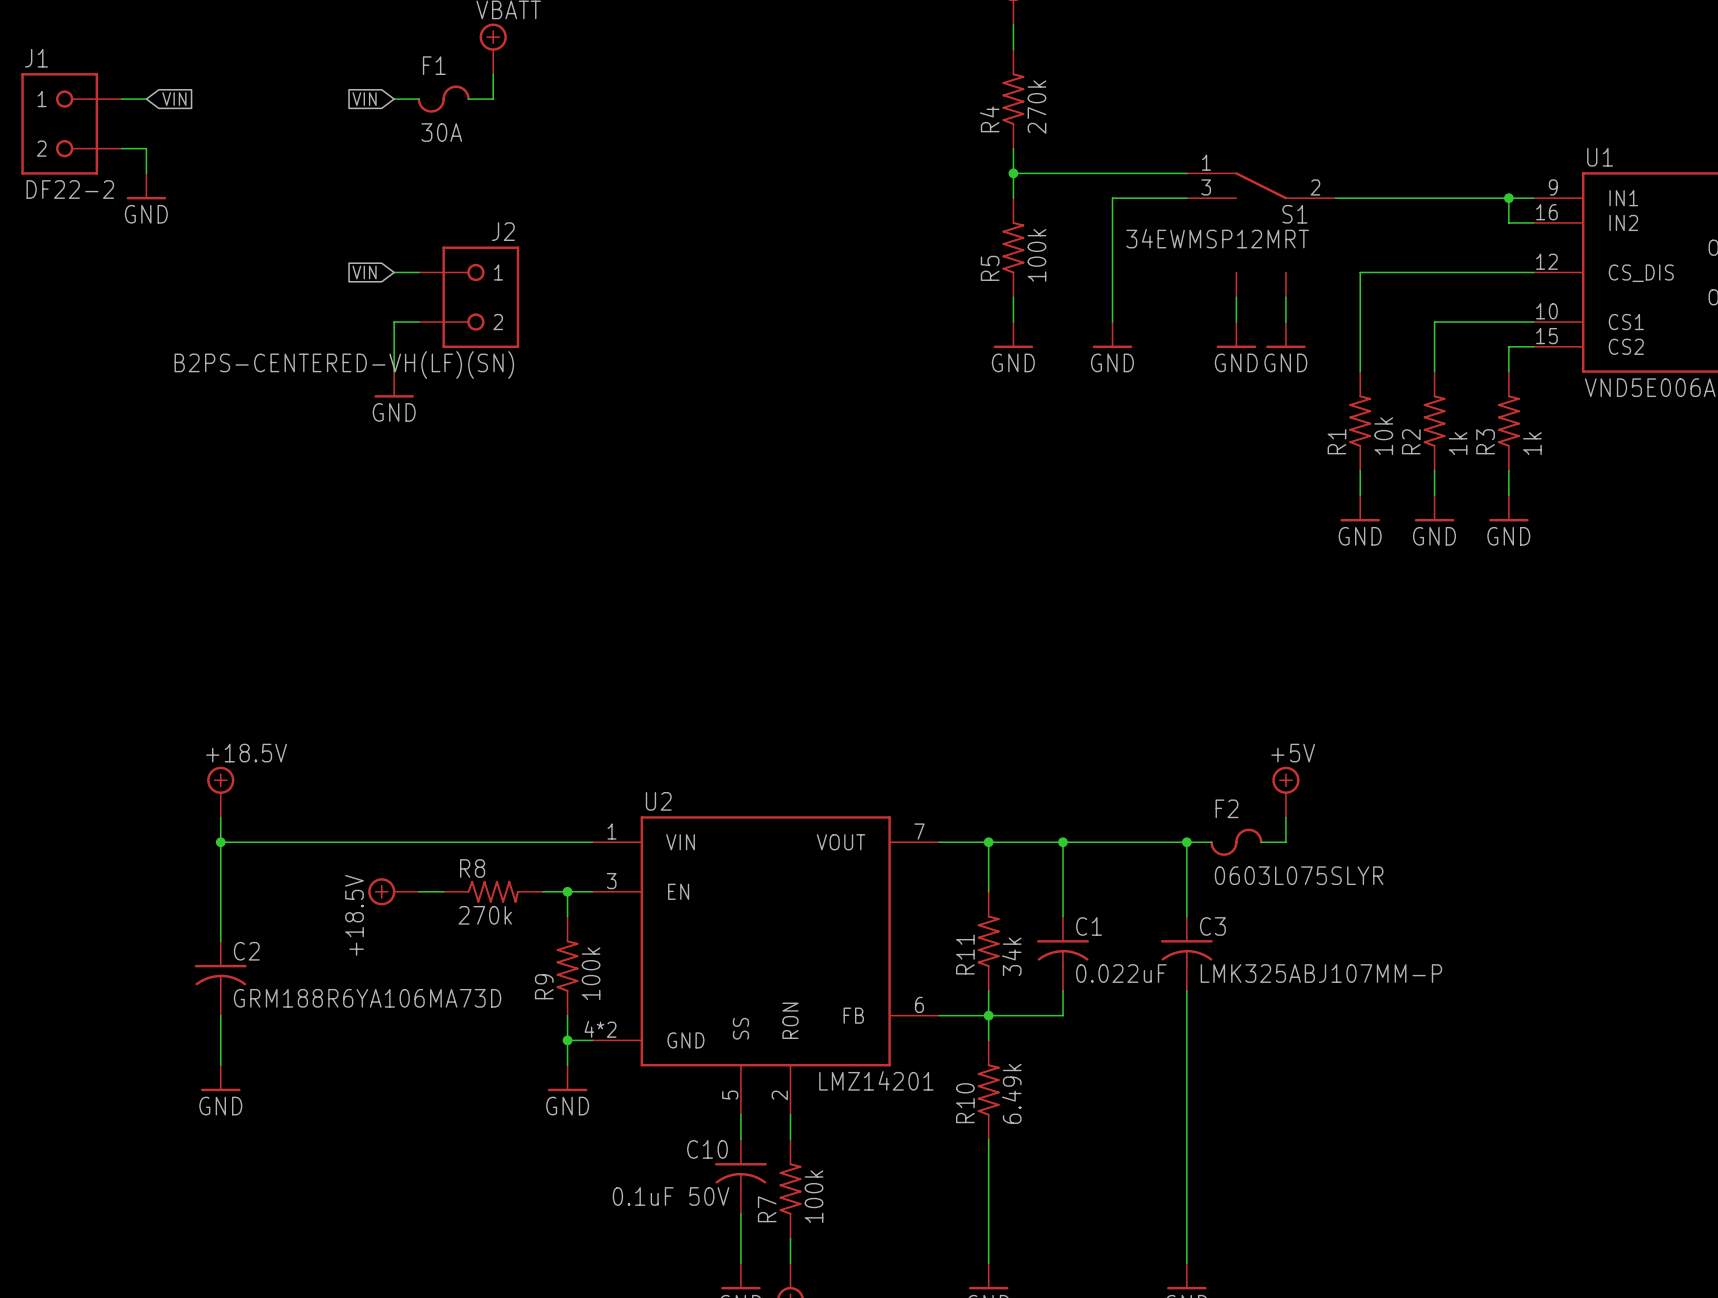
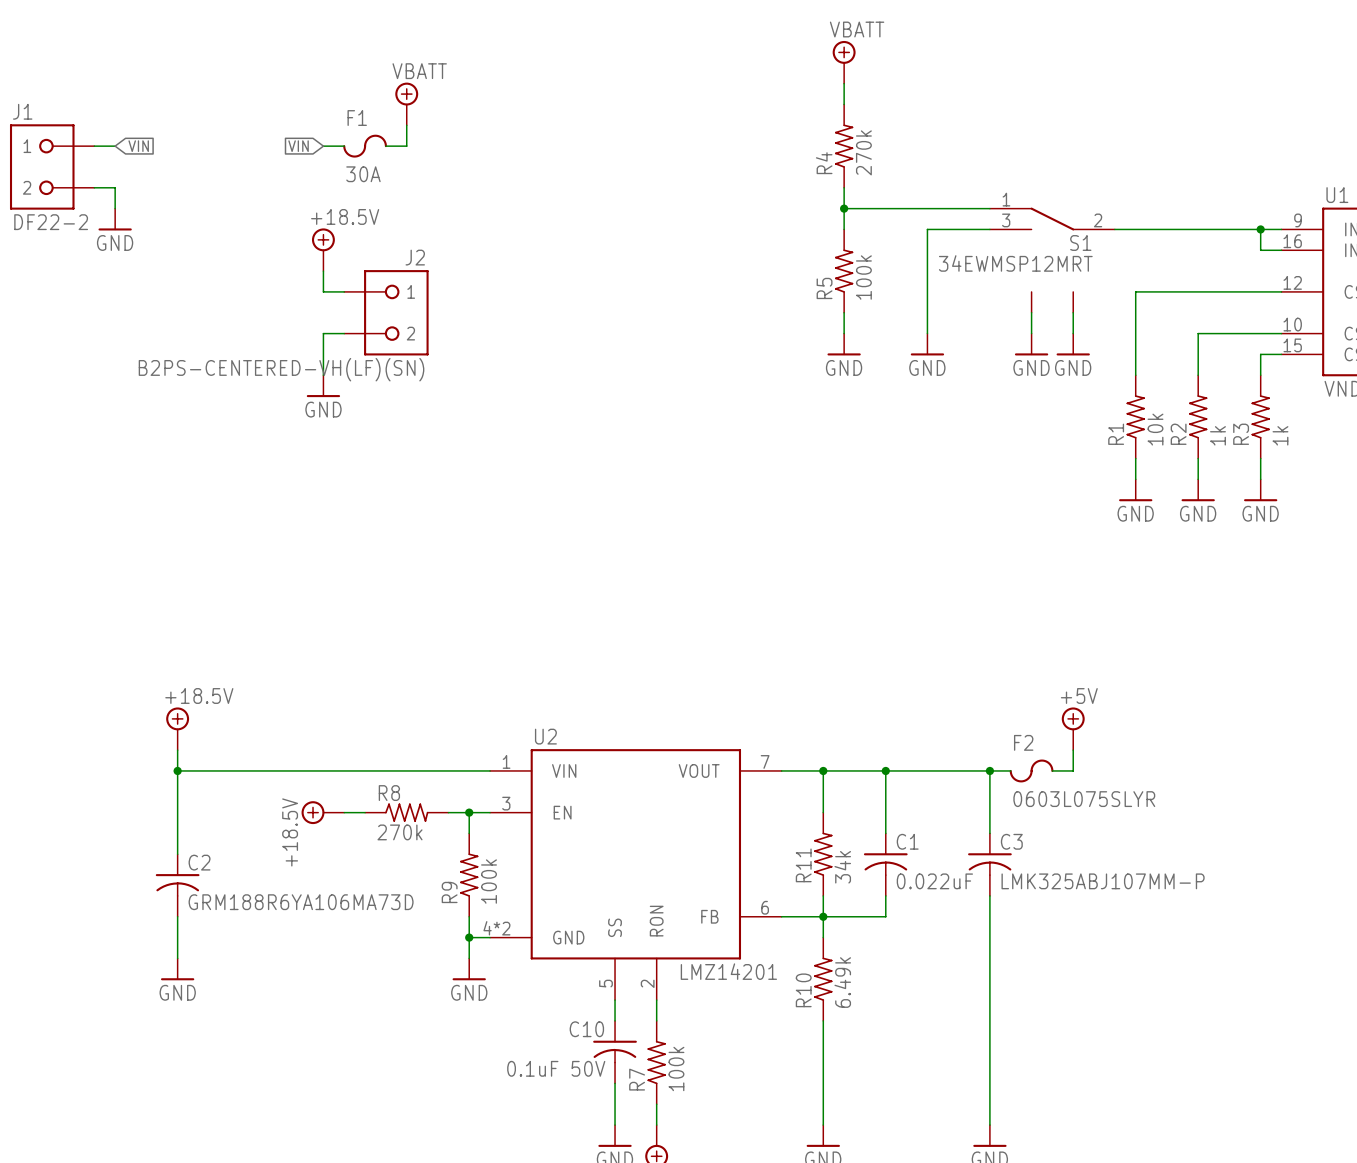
power symbol: none -> +18.5V (323, 249)
wire: none -> (323, 271) (323, 291)
global label: VIN (364, 272) -> none

